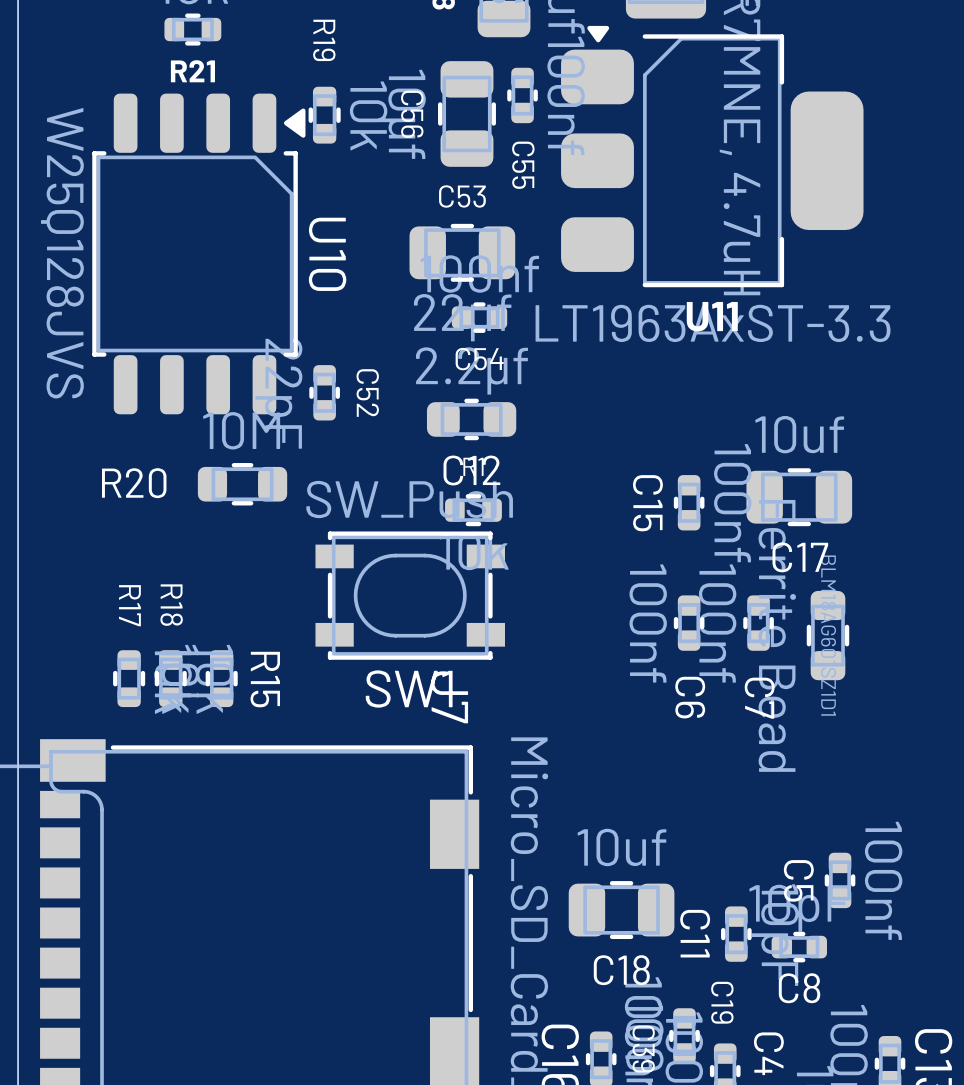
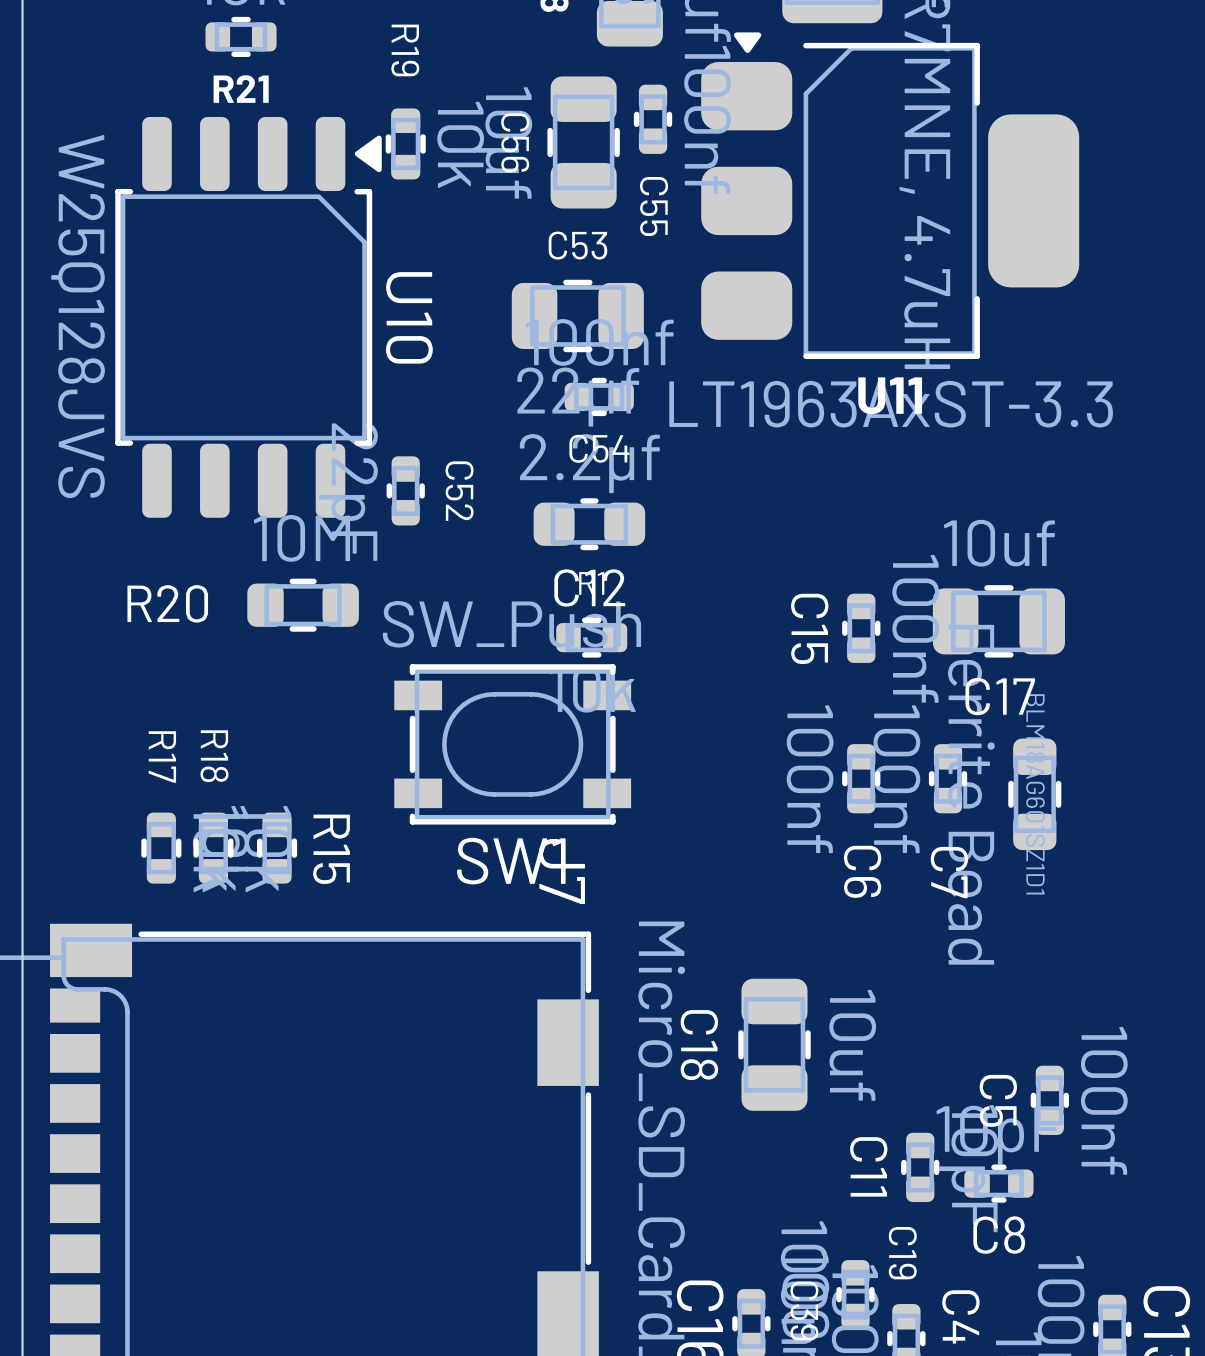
C18 rotation: 0° (621, 910) -> 90° clockwise (774, 1044)
C18 position: (621, 910) -> (774, 1044)

